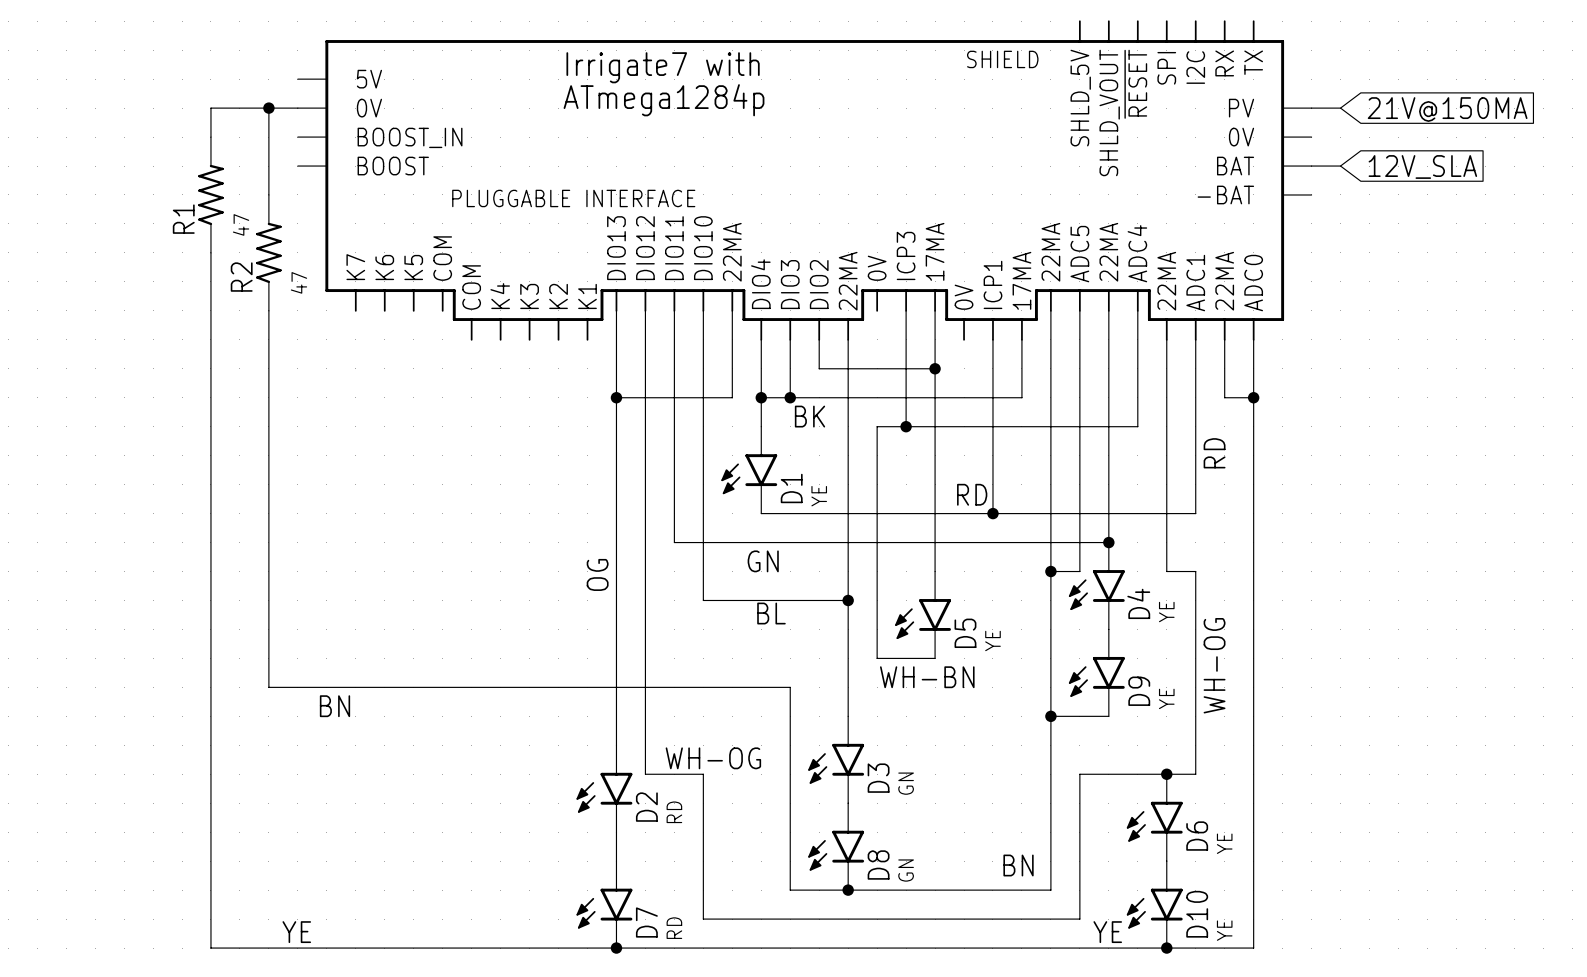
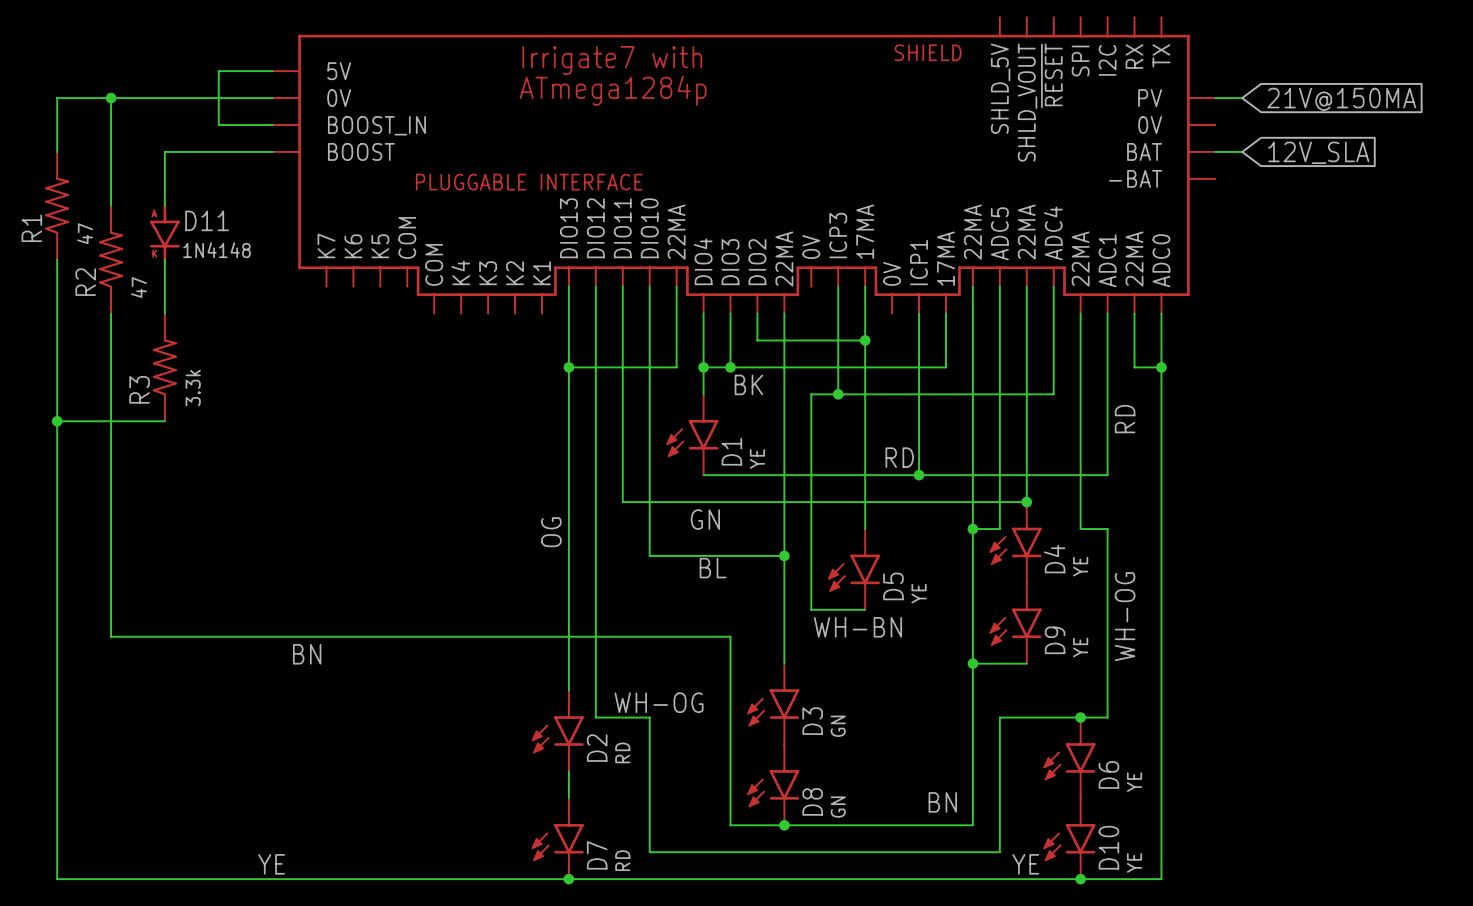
wire: none -> (272, 71) (218, 71) (218, 125) (272, 125)
wire: none -> (111, 98) (111, 205)
junction: none -> (111, 98)
wire: (210, 108) (210, 137) -> (191, 98) (57, 98) (57, 151)
wire: (268, 108) (268, 194) -> none
junction: (268, 108) -> none
wire: none -> (272, 151) (164, 151) (164, 205)
R1 position: (210, 194) -> (57, 205)
D11: none -> 1N4148 (164, 232)
wire: (210, 252) (210, 948) -> (57, 259) (57, 879) (191, 879)
R2 position: (268, 252) -> (111, 259)
wire: none -> (164, 259) (164, 313)
wire: (268, 310) (268, 687) -> (111, 313) (111, 636) (245, 636)
R3: none -> 3.3k (164, 367)
wire: none -> (57, 421) (164, 421)
junction: none -> (57, 421)

